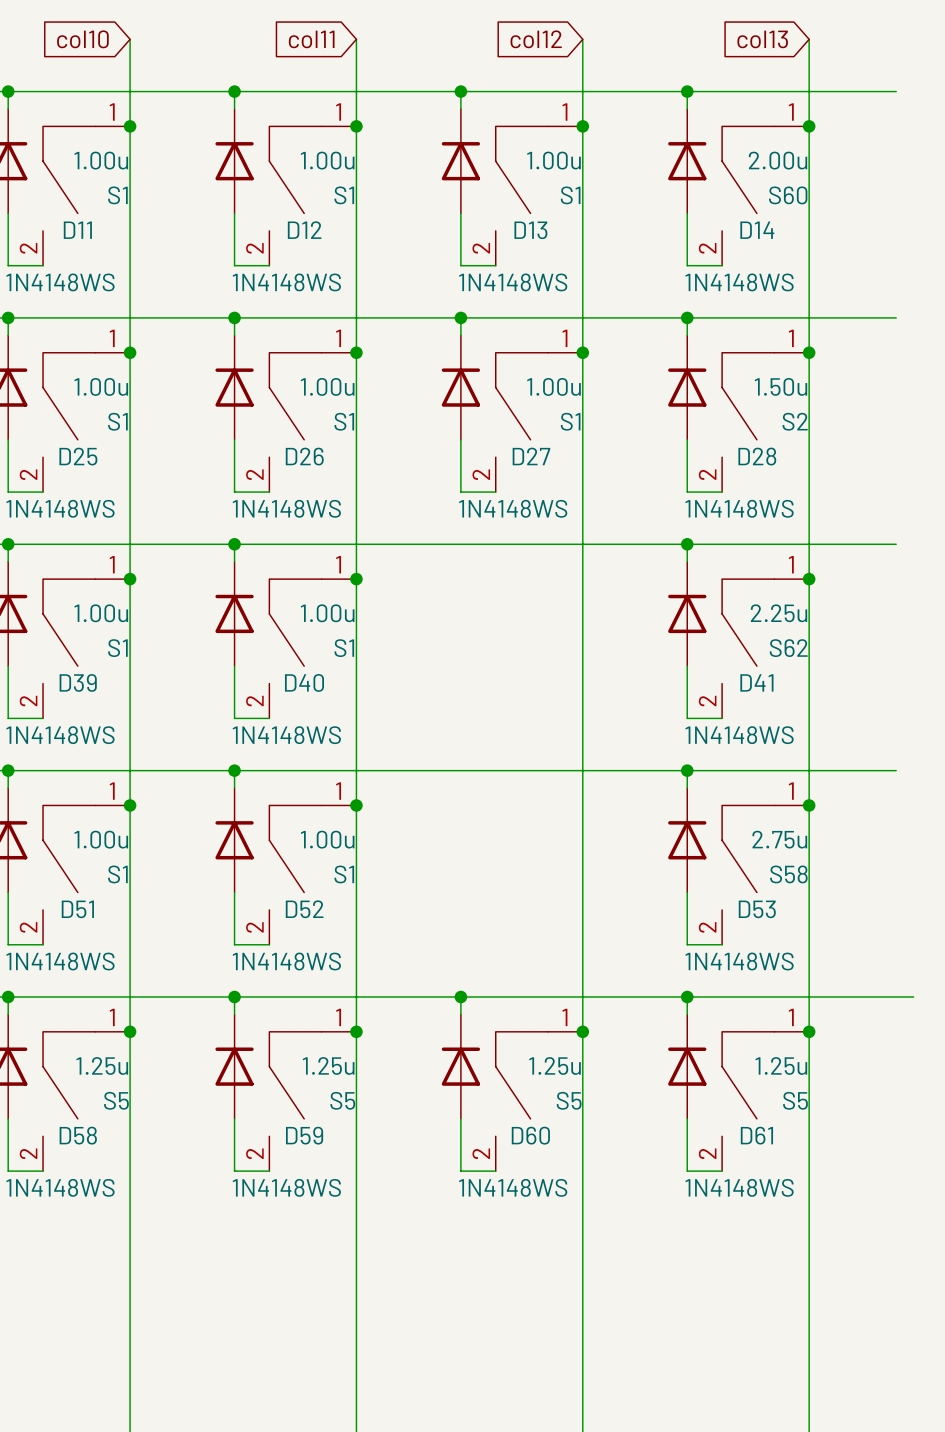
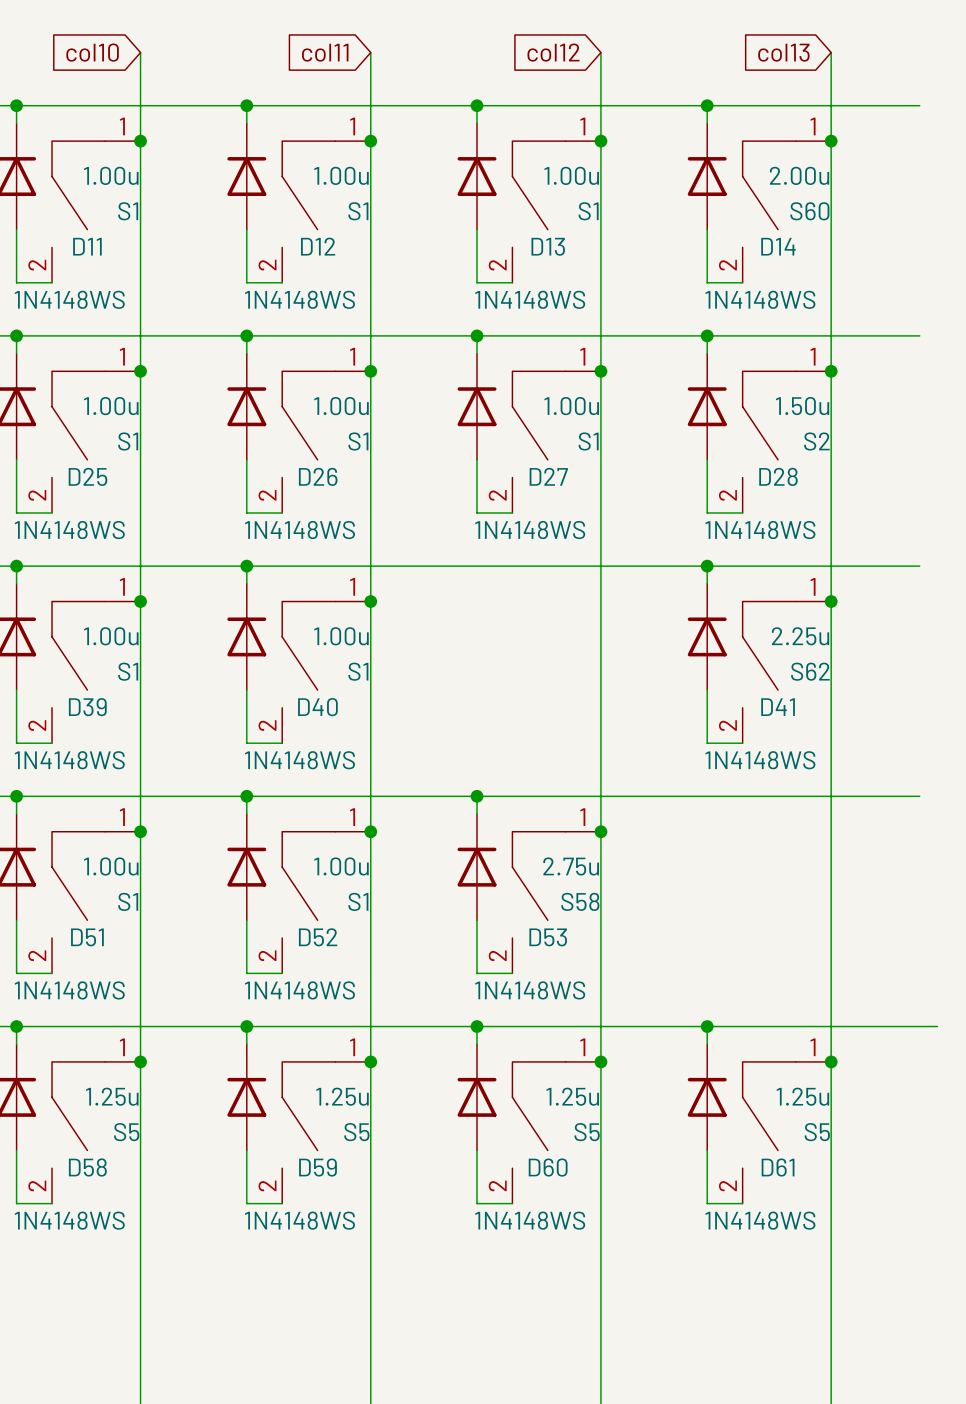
junction: none -> (477, 796)
wire: (687, 770) (687, 788) -> (477, 796) (477, 814)
junction: (687, 770) -> none
junction: none -> (600, 831)
junction: (809, 805) -> none
D53 position: (687, 840) -> (477, 867)
S58 position: (765, 875) -> (556, 902)
wire: (687, 892) (687, 944) (722, 944) -> (477, 920) (477, 973) (512, 973)

